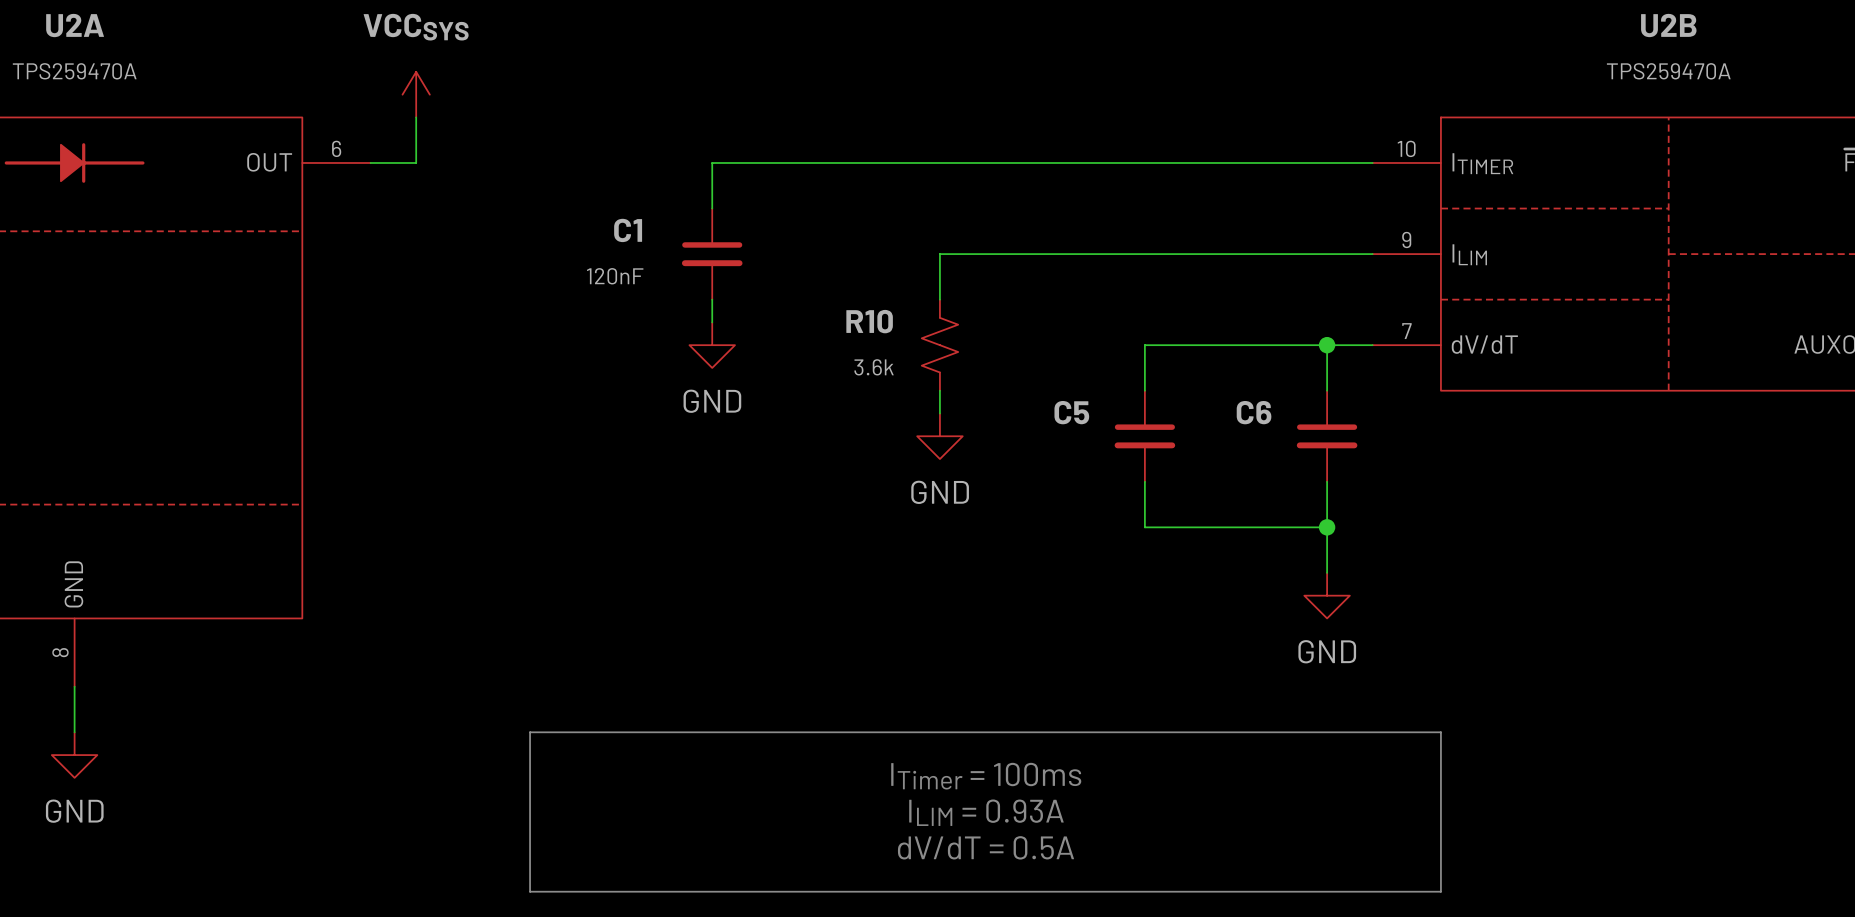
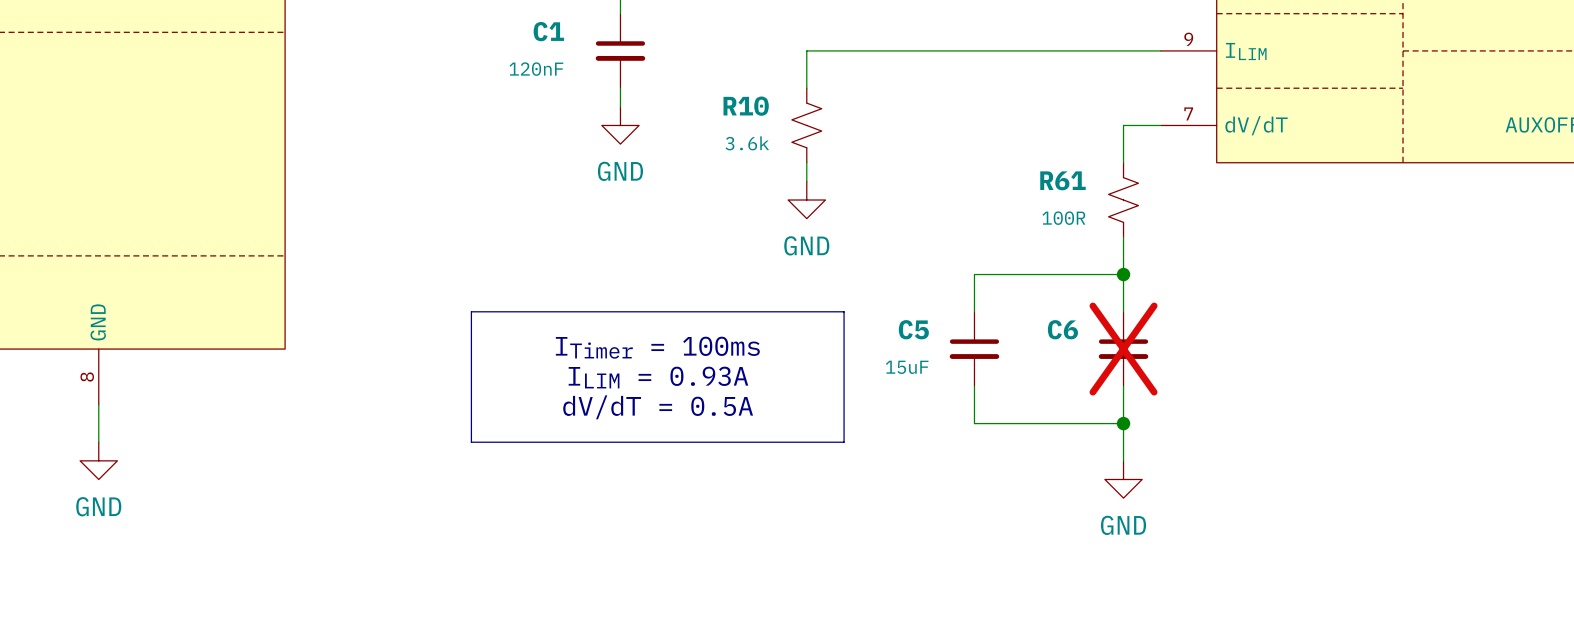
wire: (1327, 345) (1144, 345) (1144, 390) -> none
junction: (1327, 345) -> none
C5 position: (1144, 436) -> (974, 349)
C6 position: (1327, 436) -> (1123, 349)
R61: none -> 100R (1123, 200)
wire: (1144, 481) (1144, 527) -> (974, 311) (974, 274)
power symbol position: GND (1327, 595) -> GND (1123, 479)
C6 do-not-place cross: none -> (1123, 349)
C5 value: none -> 15uF (907, 367)
wire: none -> (974, 386) (974, 423) (1123, 423)
wire: none -> (1123, 386) (1123, 460)
junction: none -> (1123, 423)
line: (530, 732) (530, 891) (1440, 891) (1440, 732) (985, 732) -> (471, 442) (471, 311) (844, 311) (844, 442)
text position: ITimer = 100ms (986, 776) -> ITimer = 100ms (657, 347)
text position: ILIM = 0.93A (986, 812) -> ILIM = 0.93A (658, 377)
text position: dV/dT = 0.5A (985, 847) -> dV/dT = 0.5A (658, 407)

